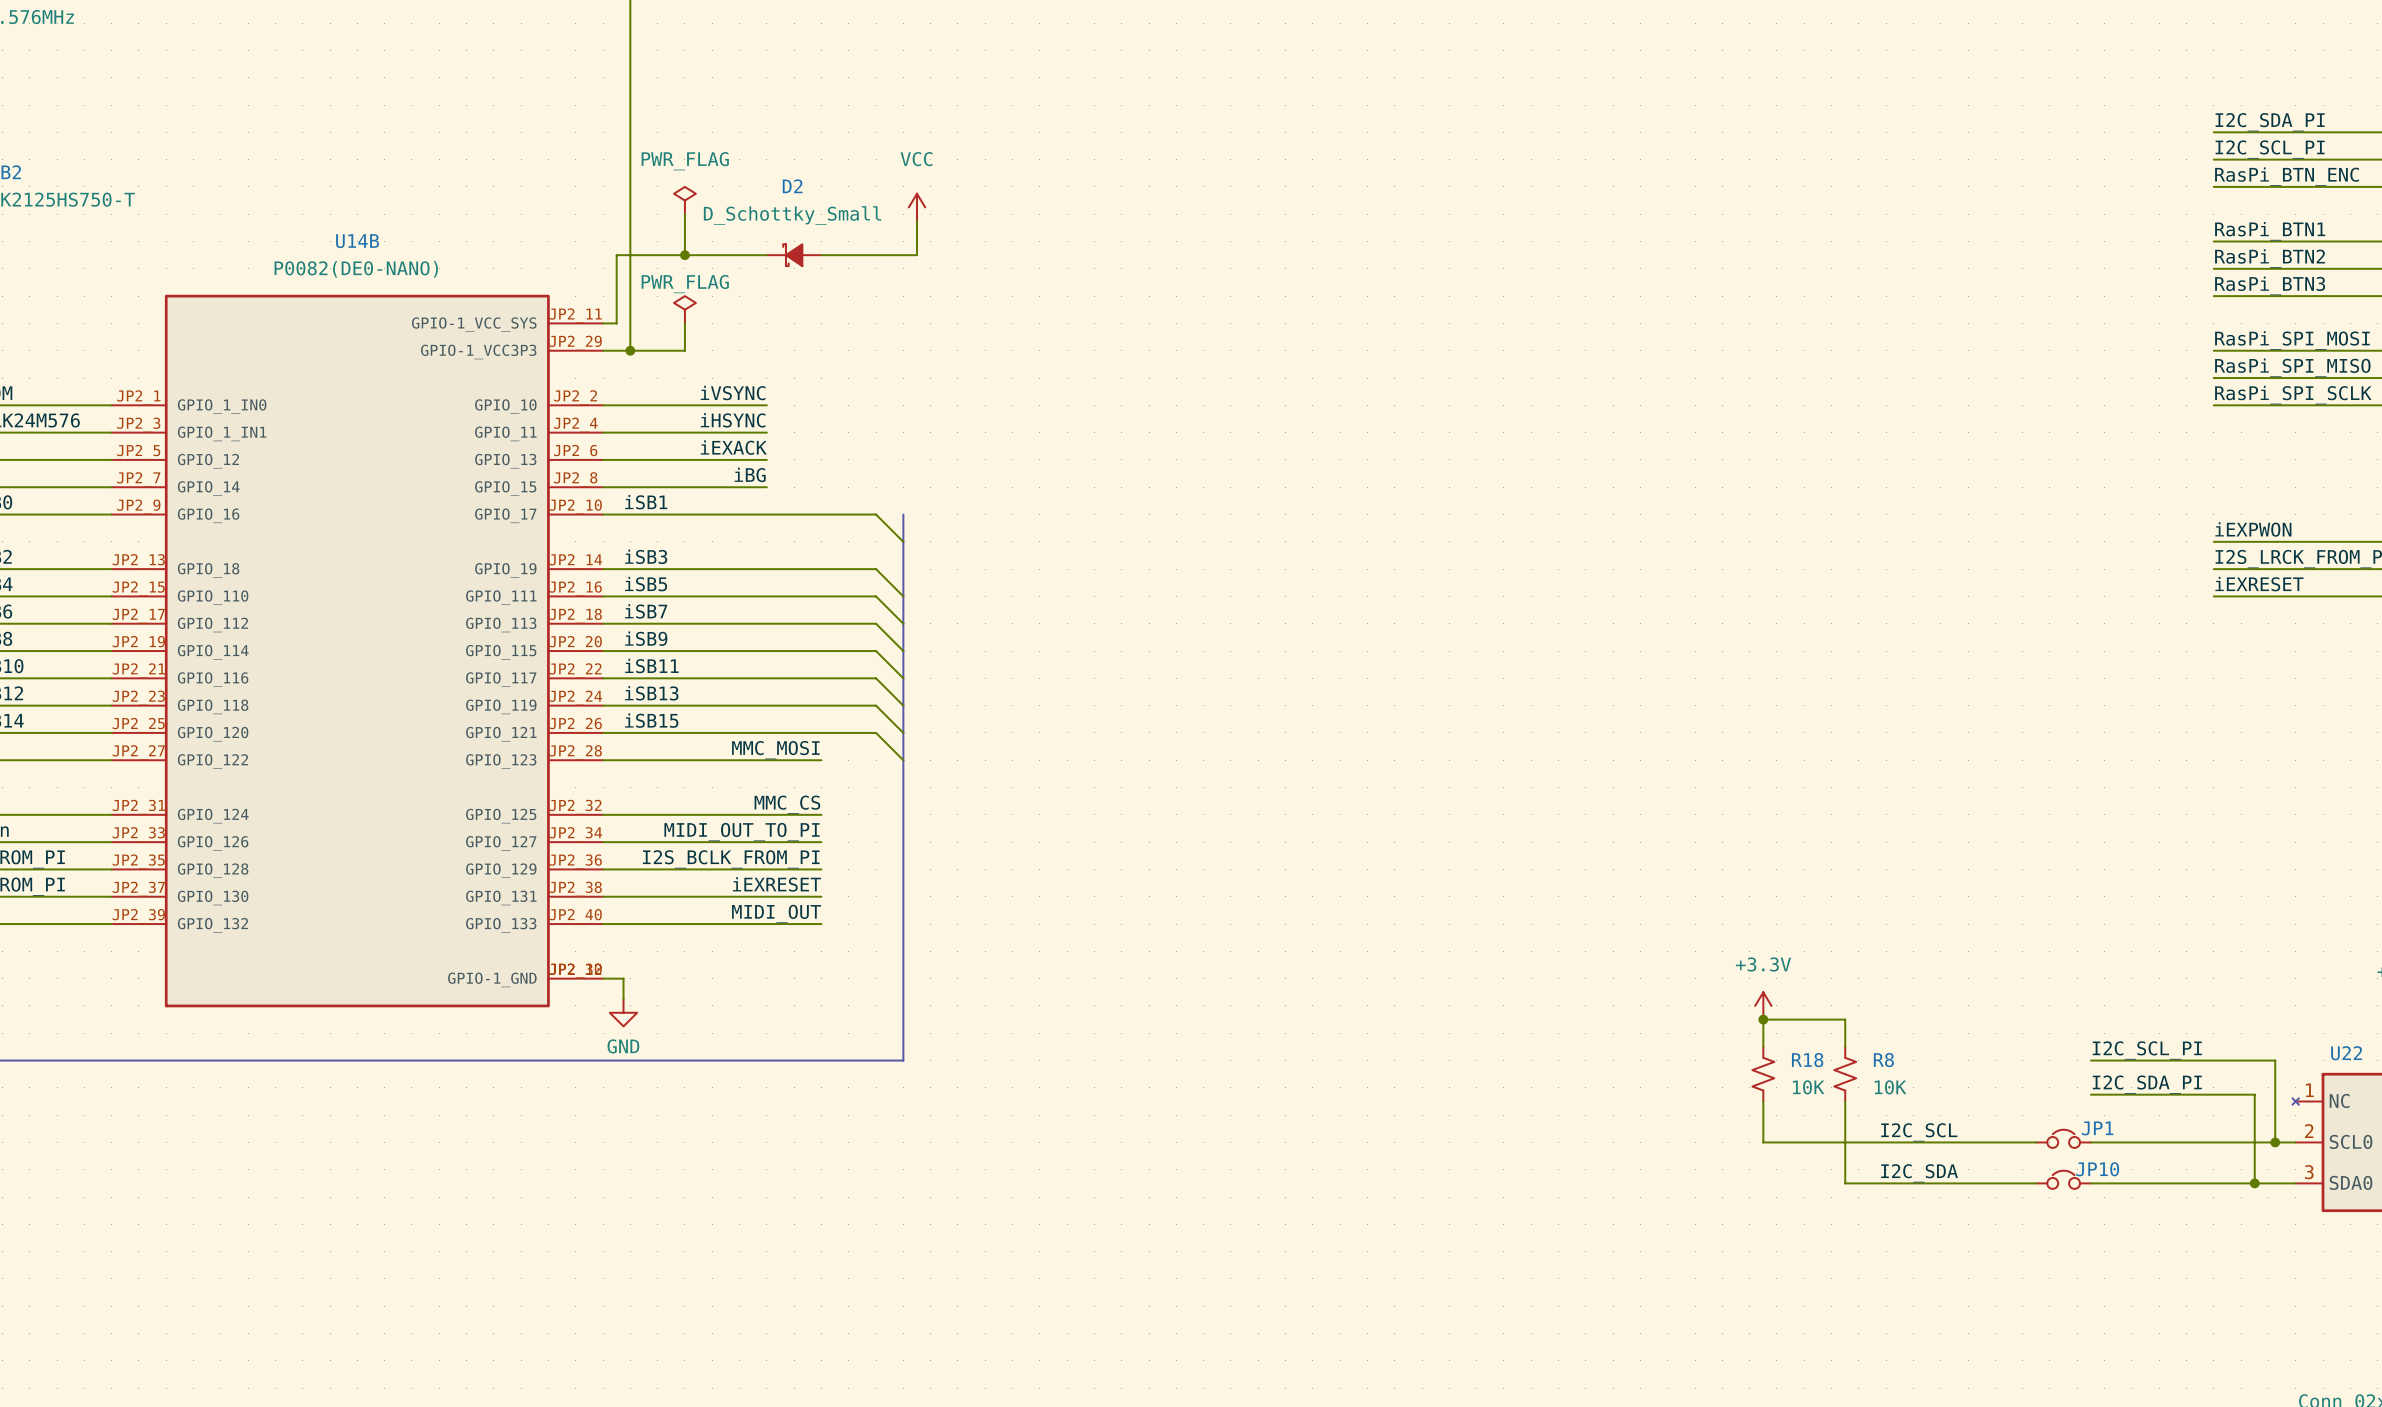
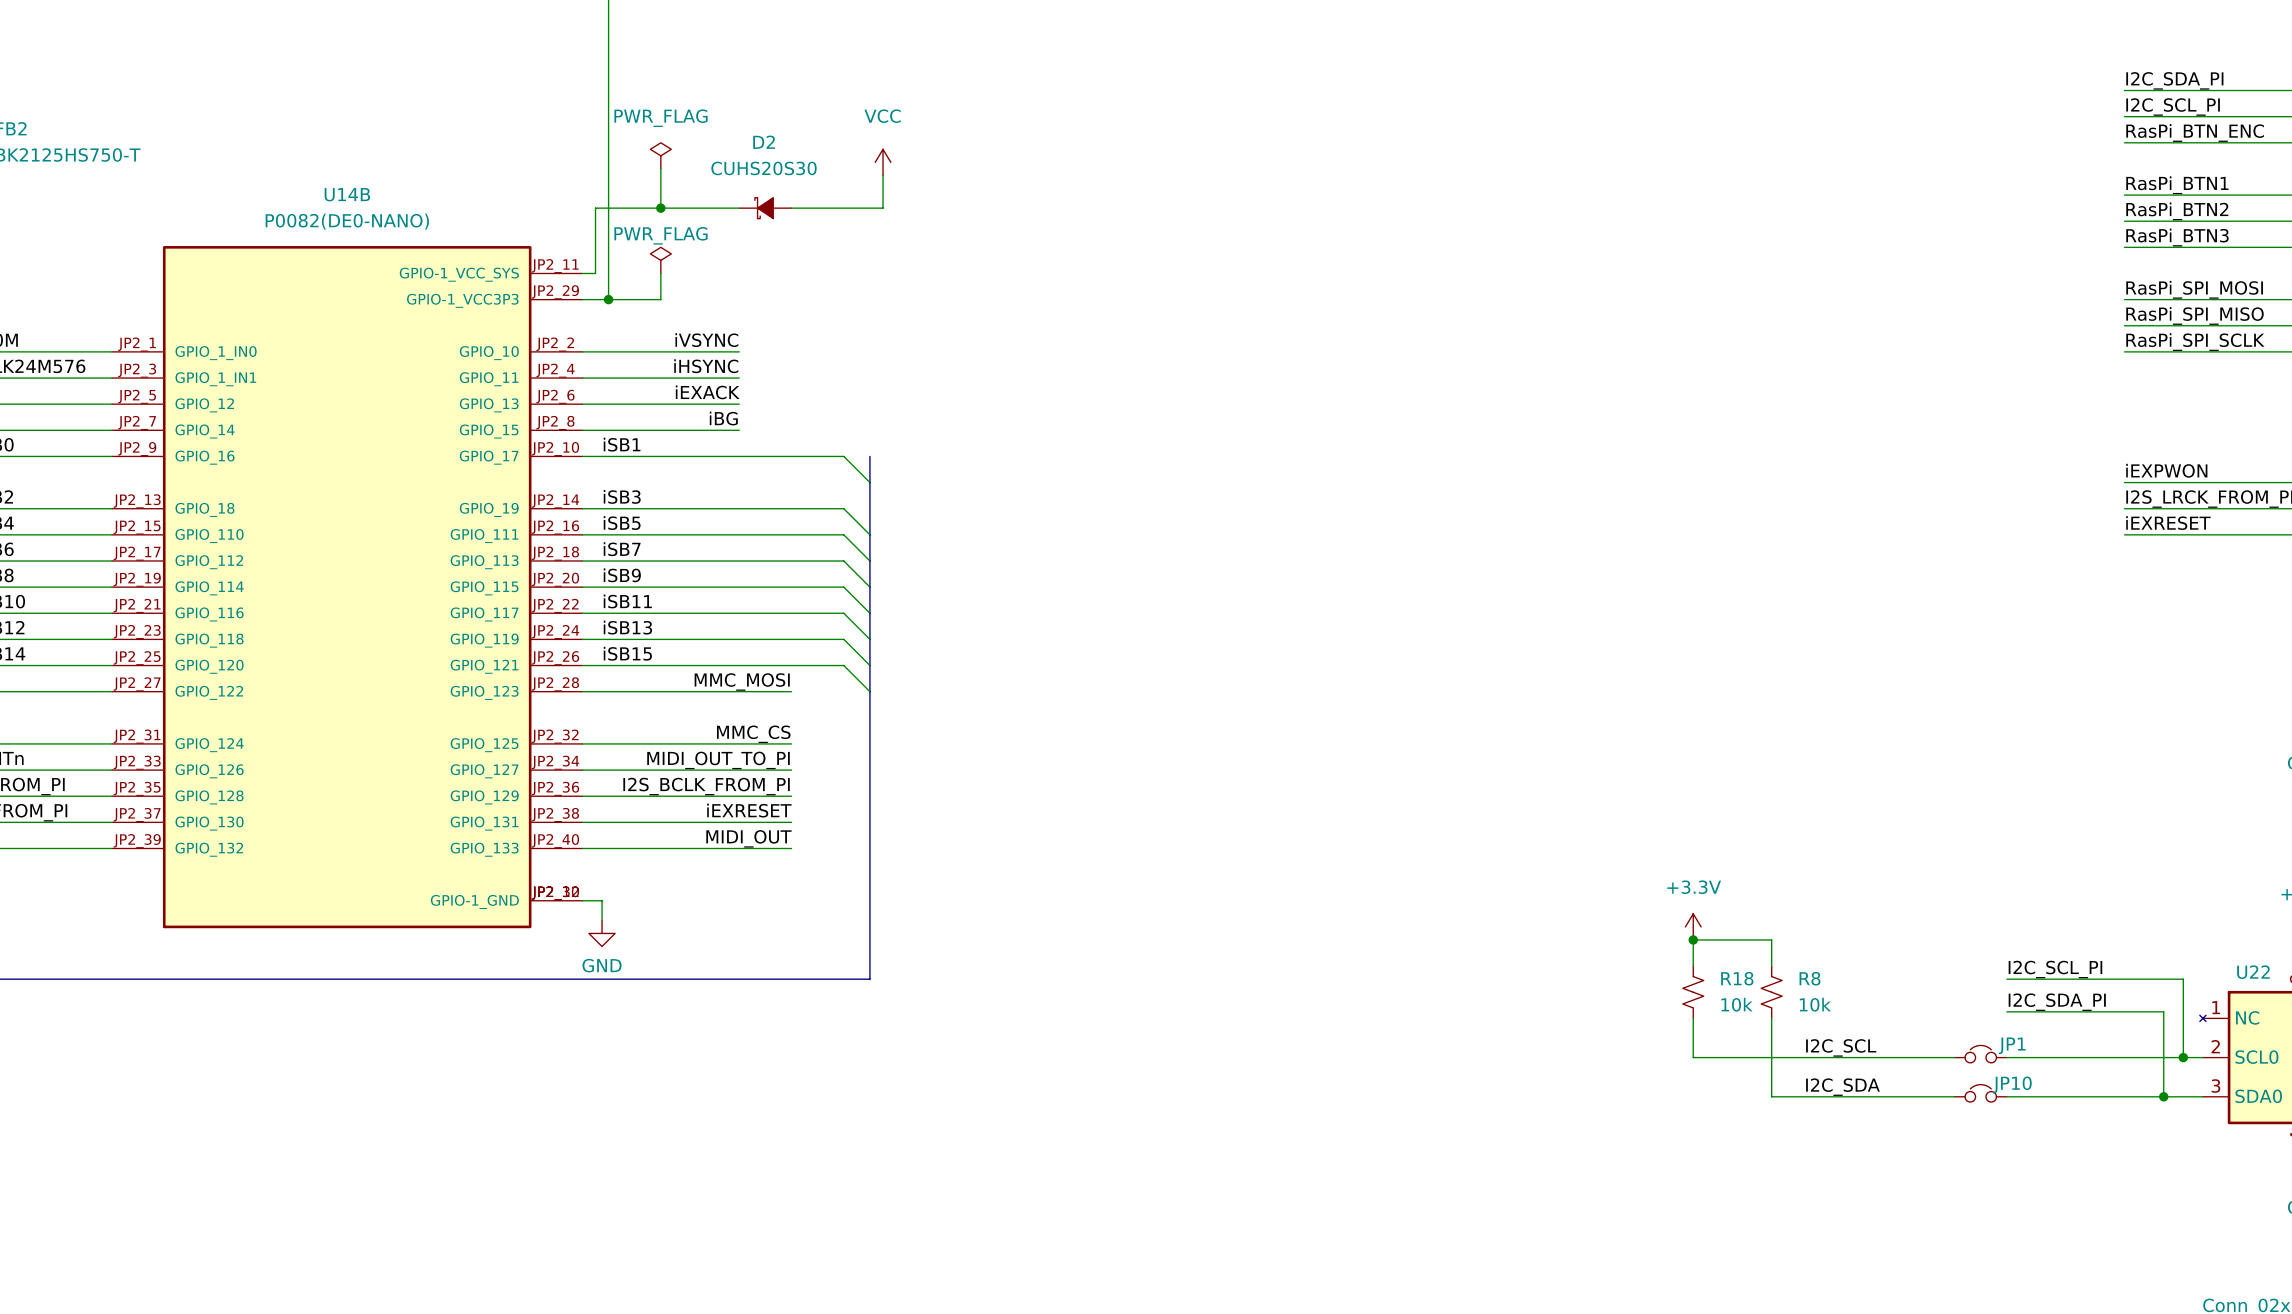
D2 value: D_Schottky_Small (792, 215) -> CUHS20S30 (764, 168)
R18 value: 10K (1808, 1087) -> 10k (1736, 1004)
R8 value: 10K (1890, 1087) -> 10k (1815, 1004)

